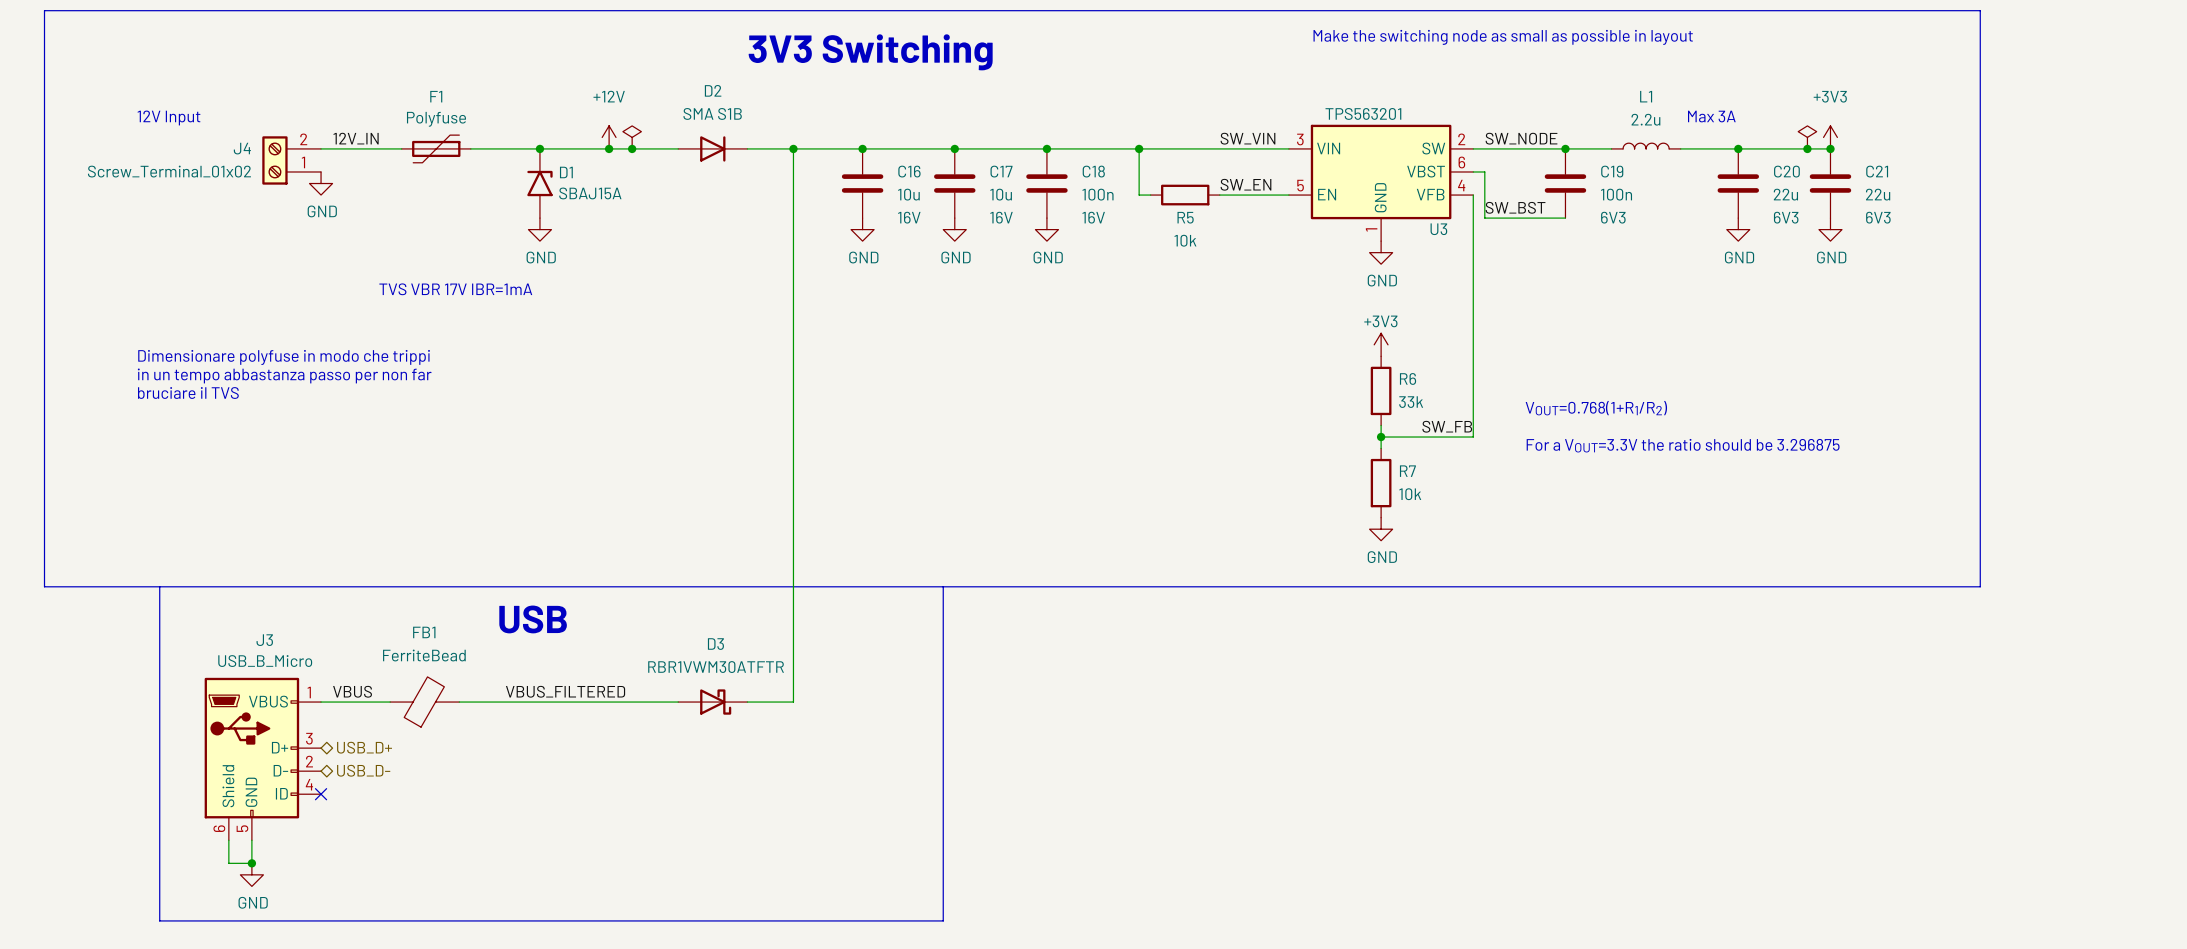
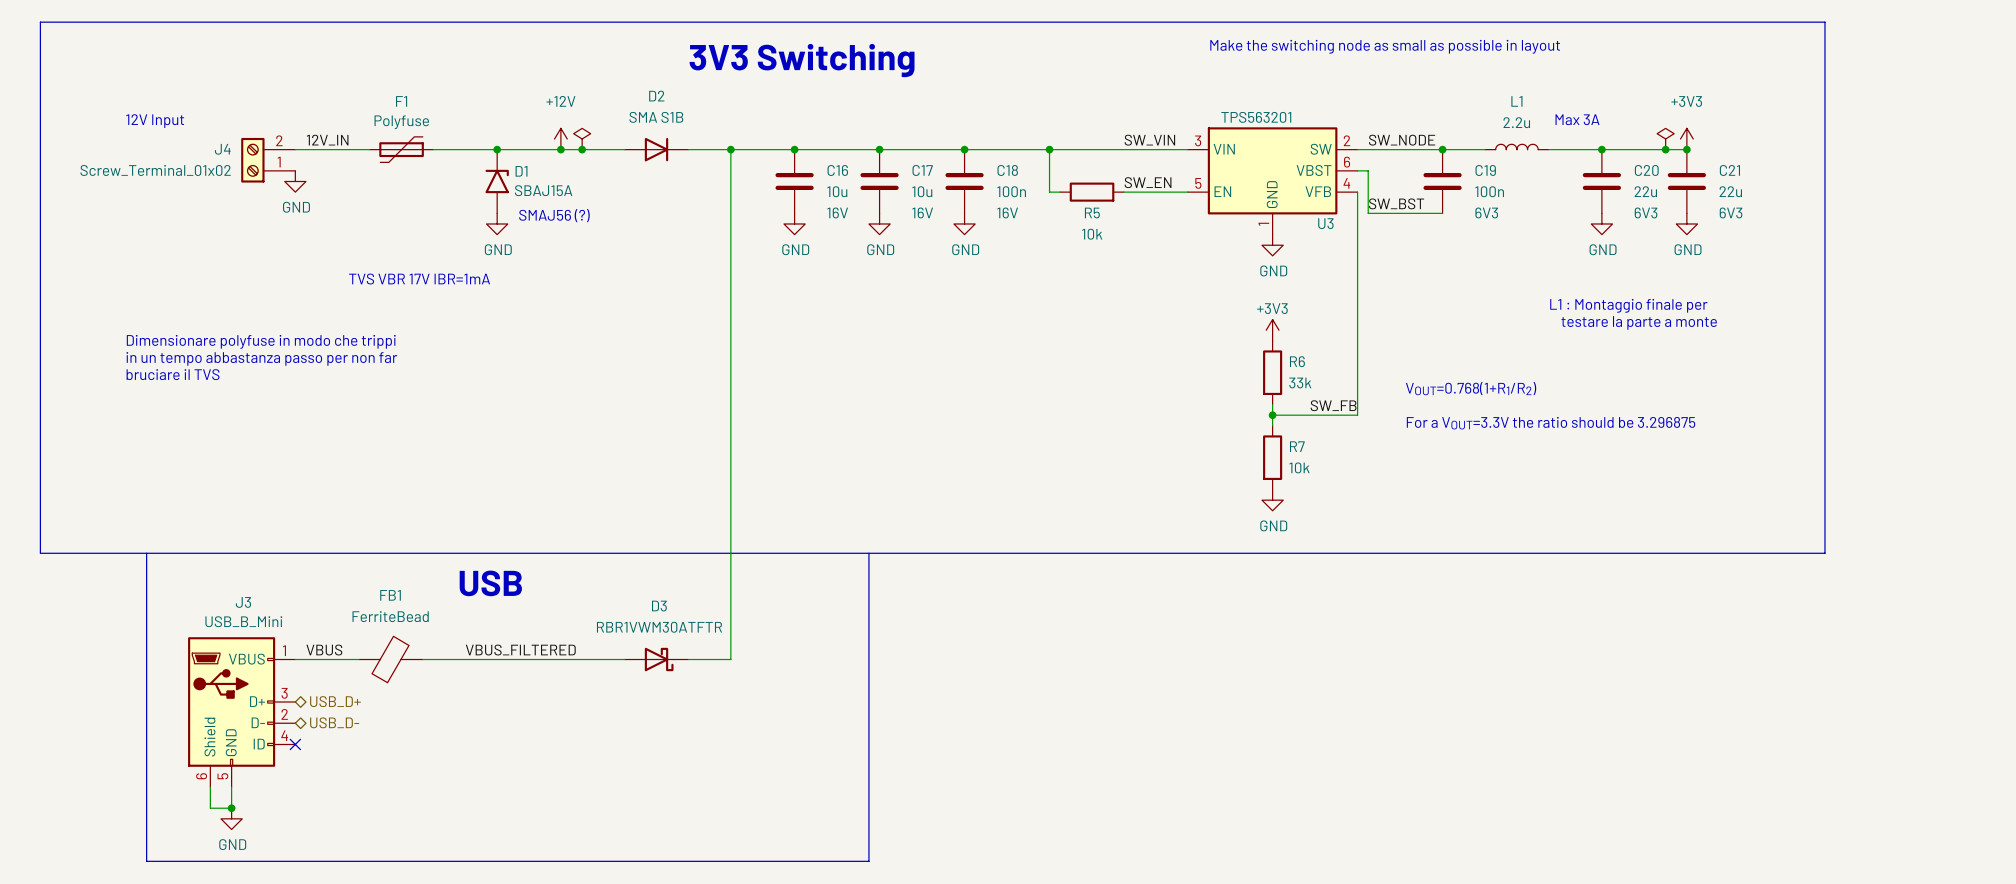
text: none -> SMAJ56 (?) (554, 215)
text: none -> L1 : Montaggio finale per (1628, 305)
text: none -> testare la parte a monte (1639, 322)
J3 value: USB_B_Micro (265, 661) -> USB_B_Mini (243, 621)

